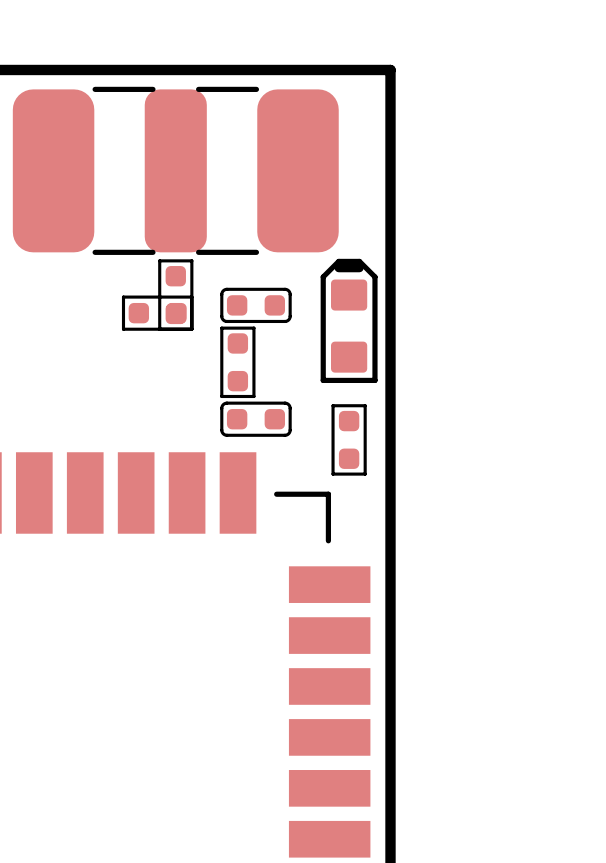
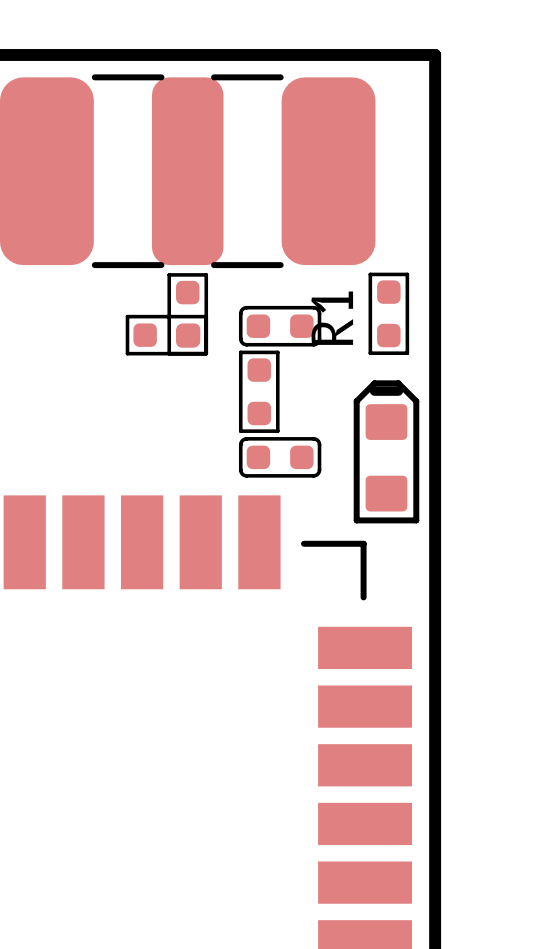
R1: none -> (388, 313)
part: (349, 320) -> none
part footprint: [331, 404, 367, 476] -> [353, 380, 420, 524]

